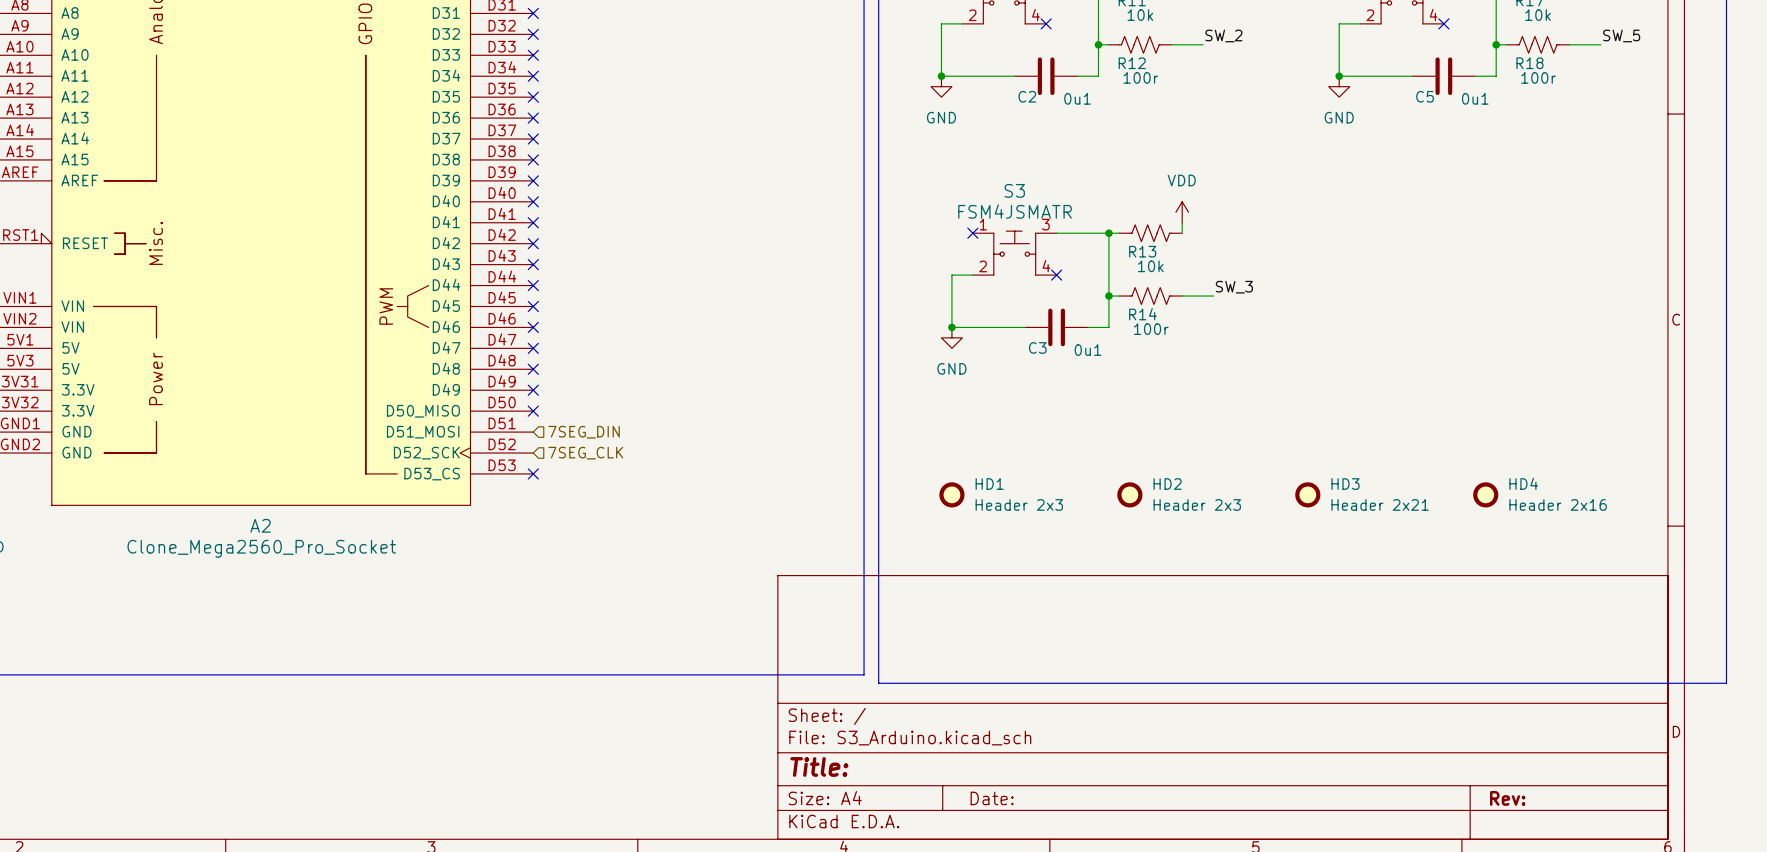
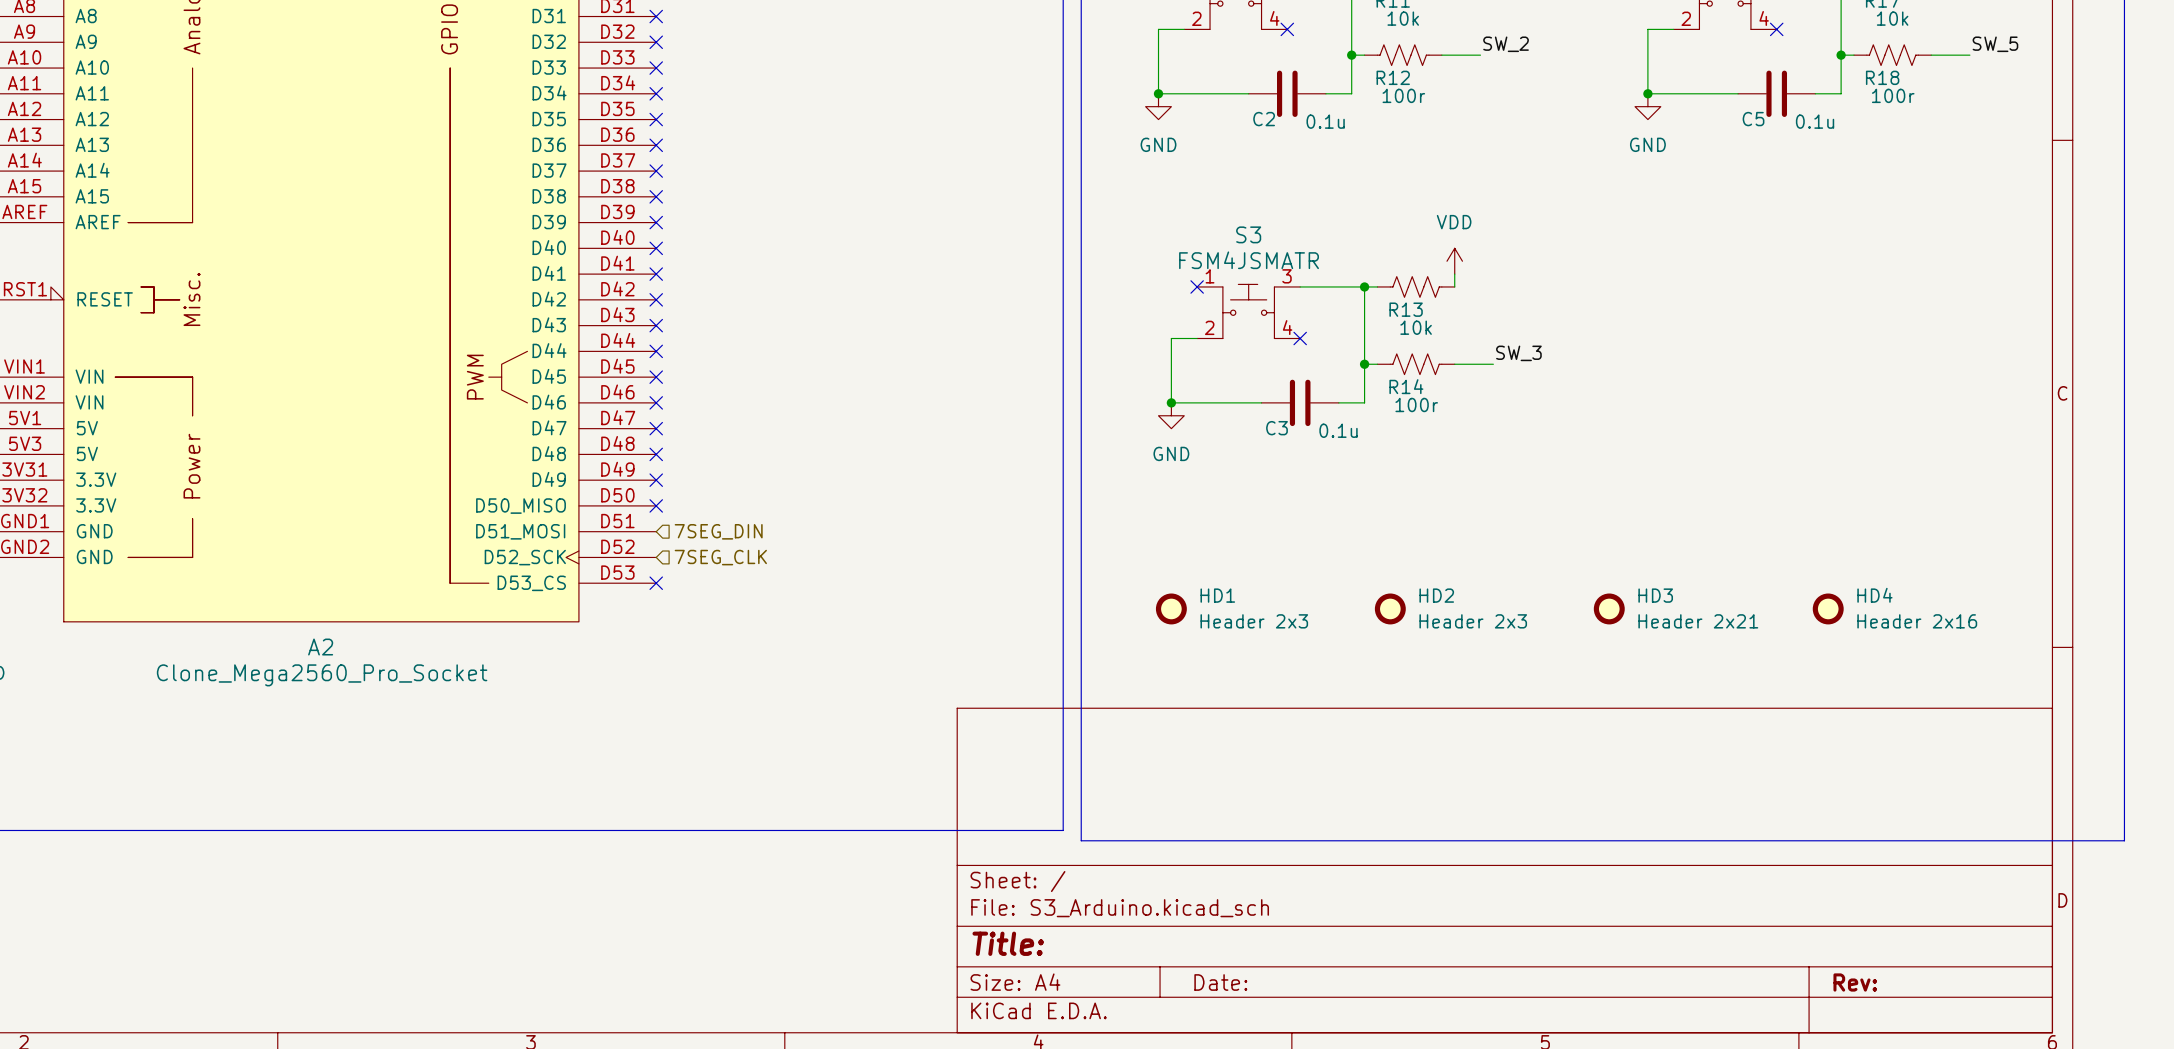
C2 value: 0u1 (1077, 98) -> 0.1u (1325, 121)
C5 value: 0u1 (1475, 98) -> 0.1u (1815, 121)
C3 value: 0u1 (1088, 350) -> 0.1u (1338, 430)

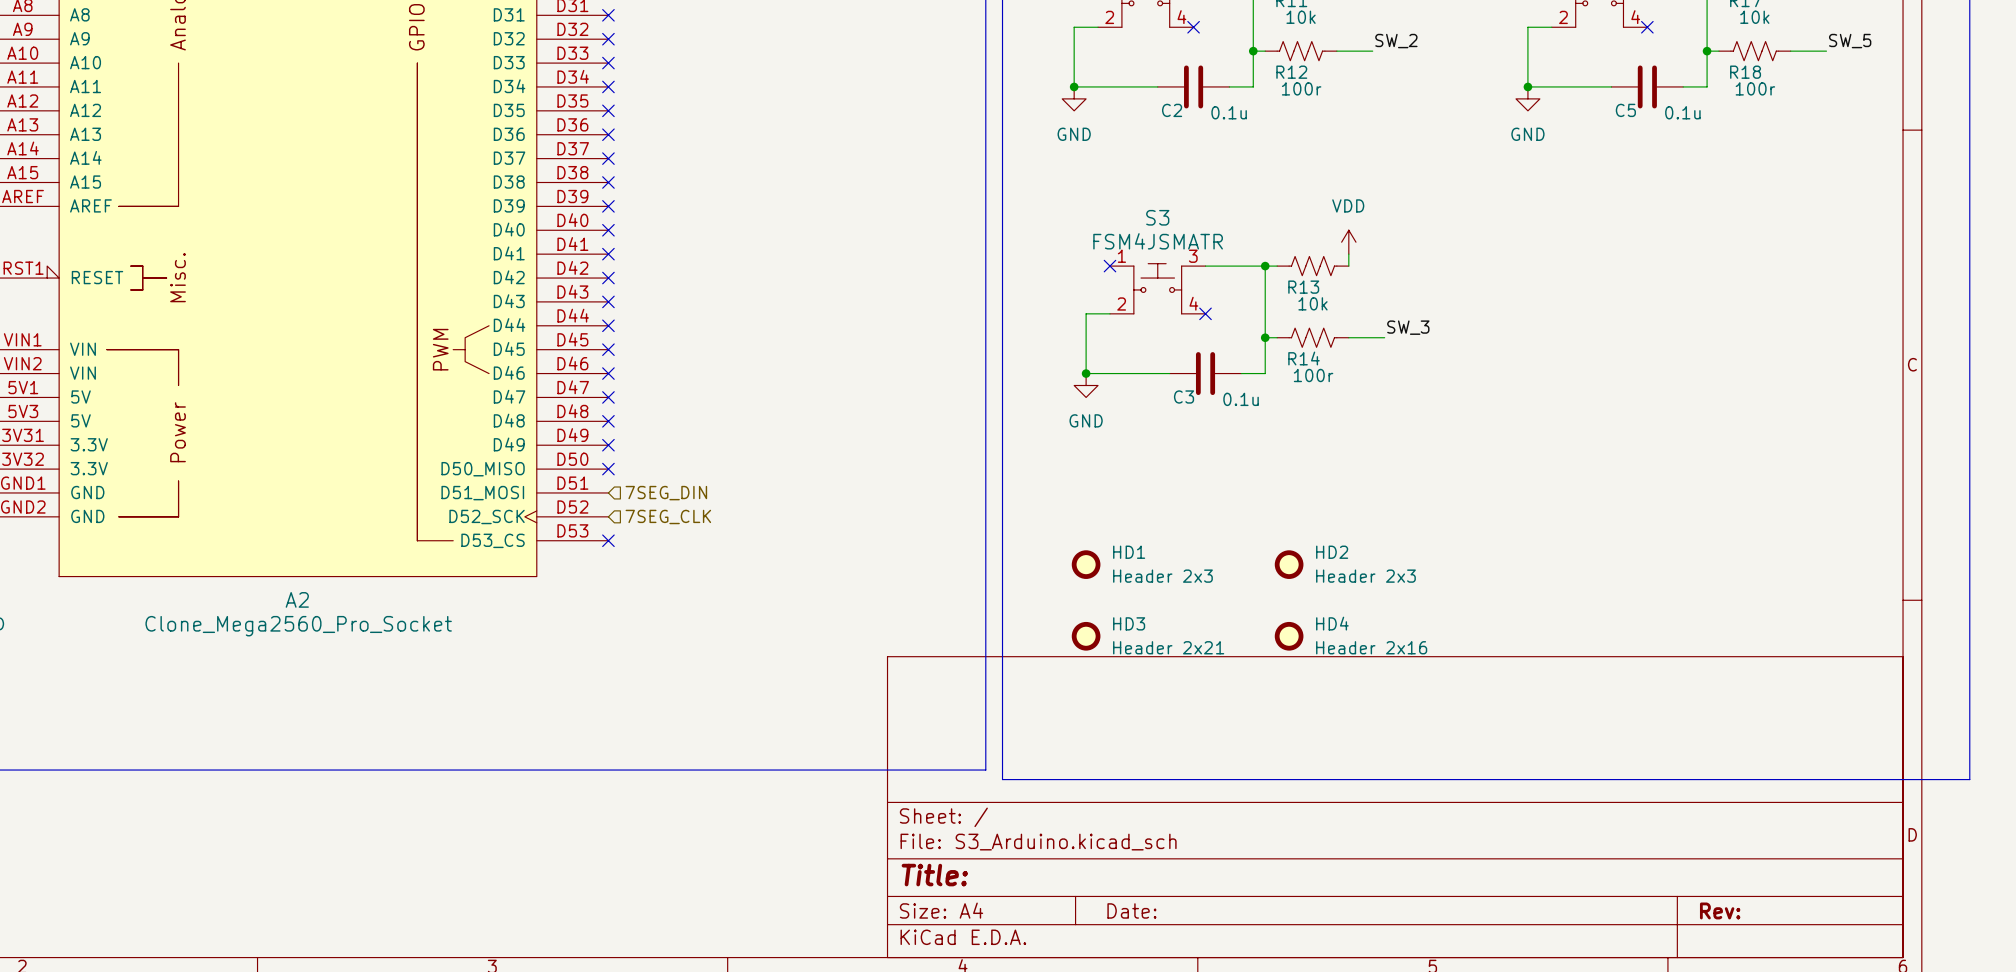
HD3 position: (1609, 608) -> (1086, 636)
HD4 position: (1828, 608) -> (1289, 636)

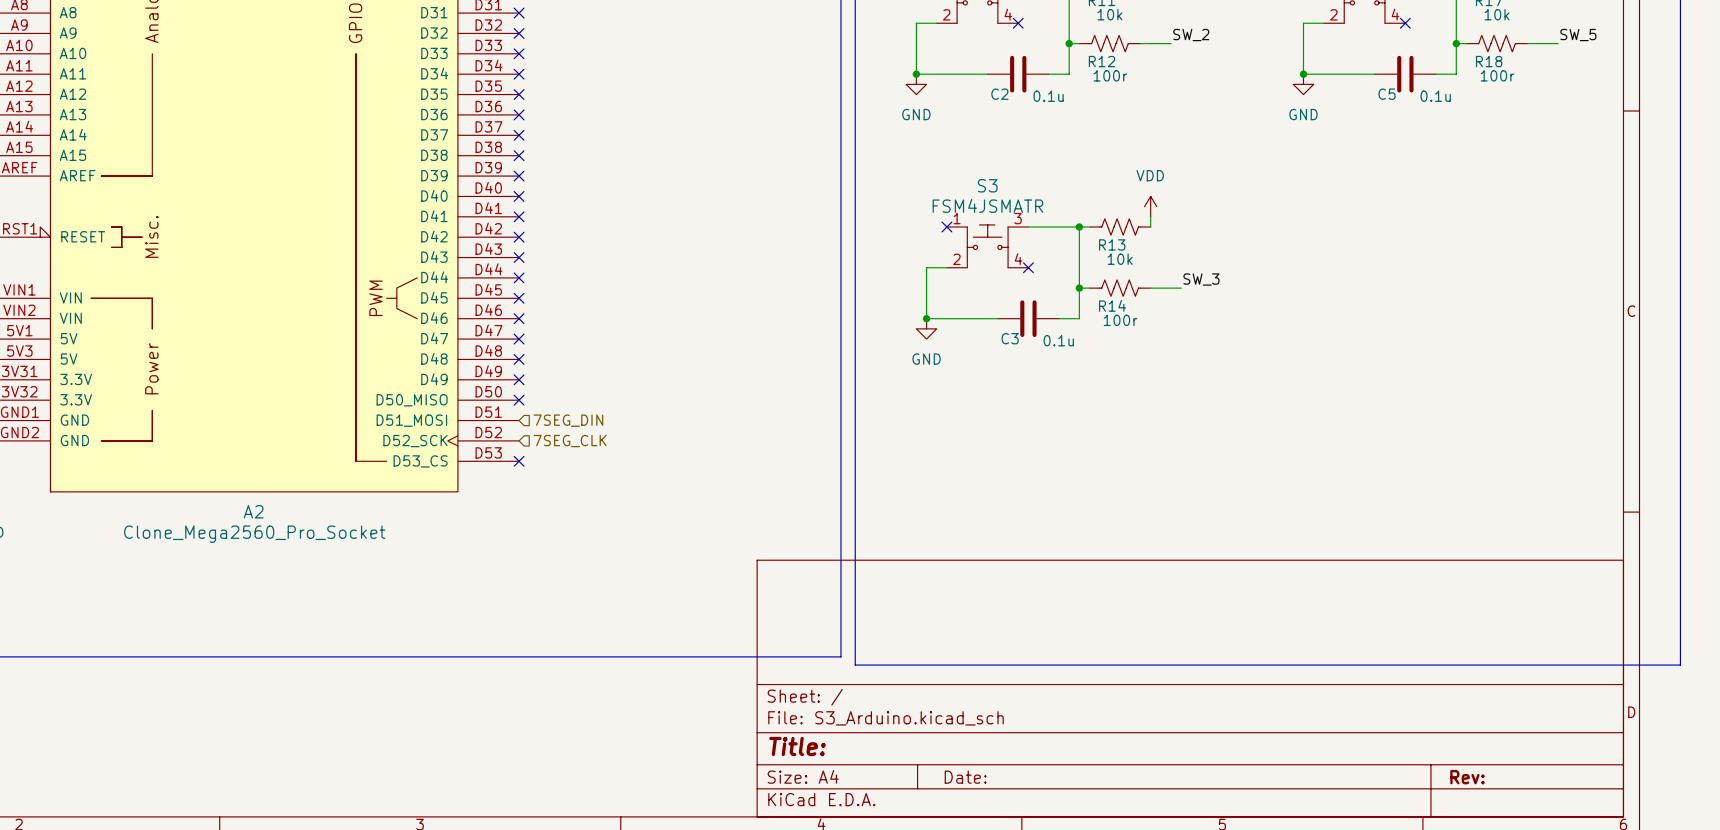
HD1: Header 2x3 (1086, 564) -> none
HD2: Header 2x3 (1289, 564) -> none
HD3: Header 2x21 (1086, 636) -> none
HD4: Header 2x16 (1289, 636) -> none

